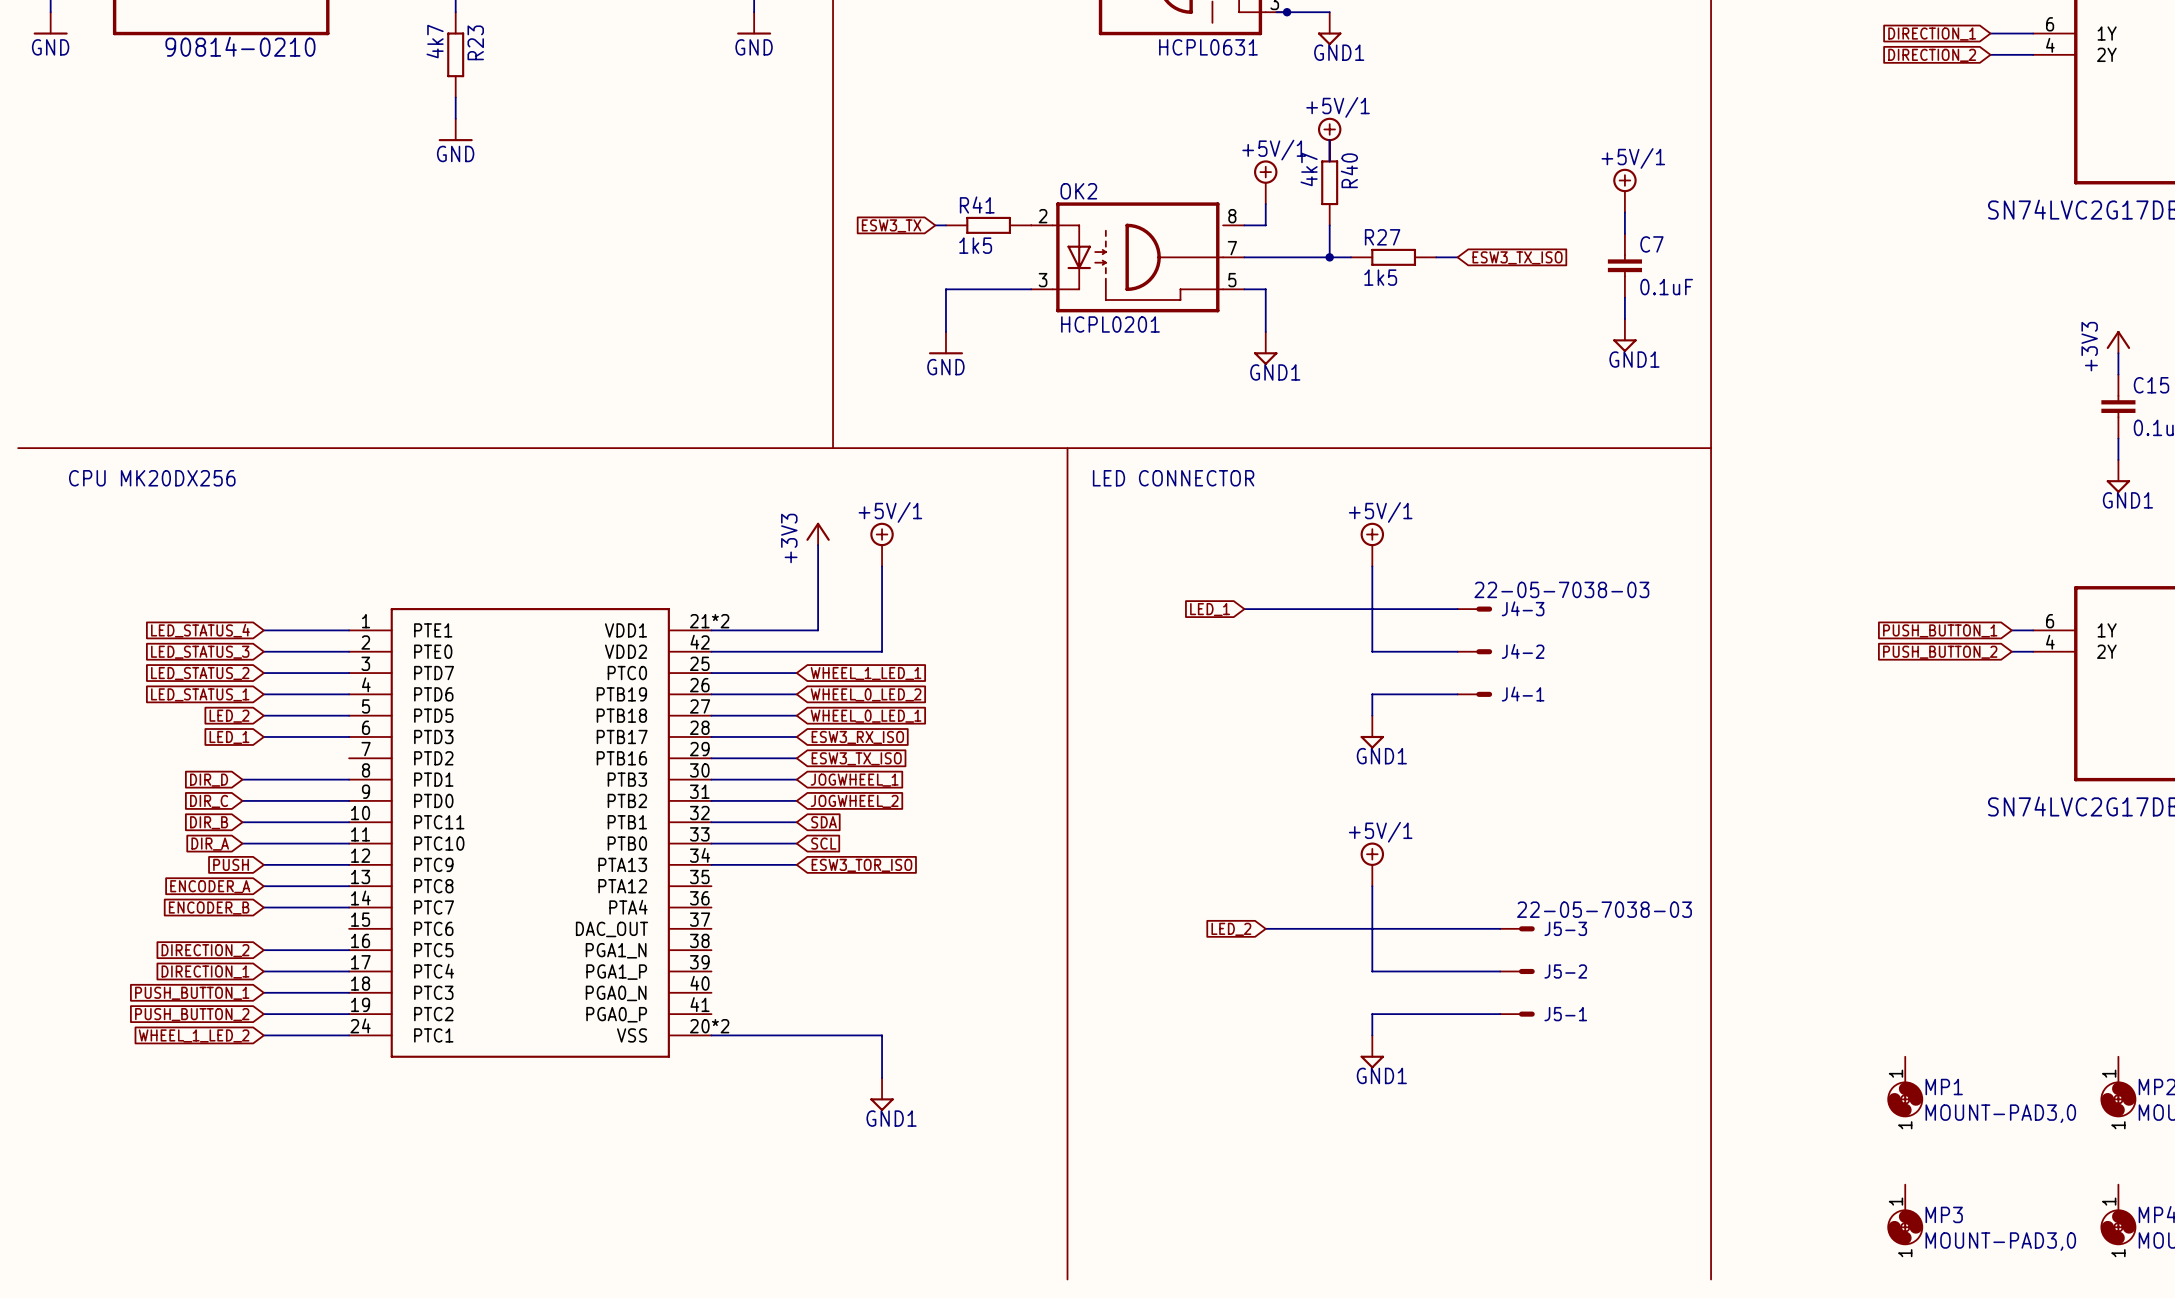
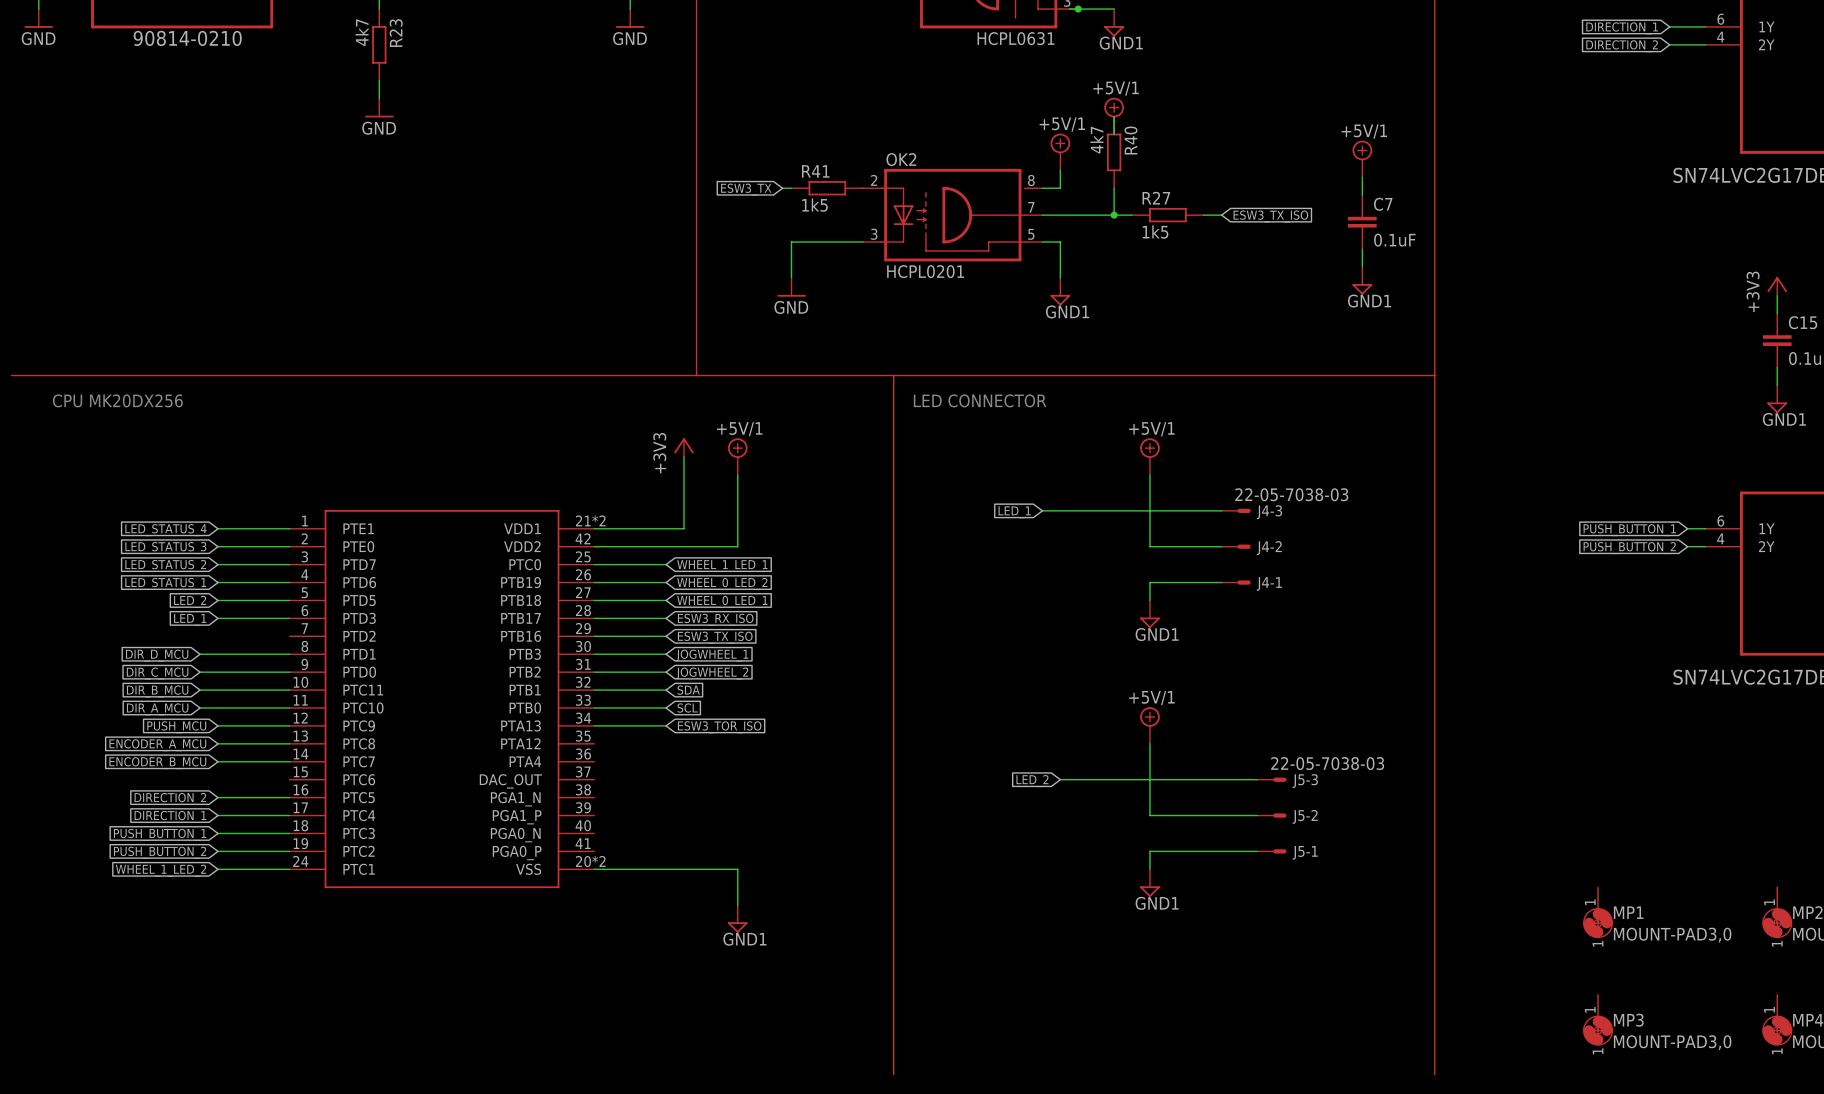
global label: DIR_D (209, 780) -> DIR_D_MCU (157, 655)
global label: DIR_C (209, 801) -> DIR_C_MCU (157, 673)
global label: DIR_B (209, 822) -> DIR_B_MCU (157, 691)
global label: DIR_A (210, 844) -> DIR_A_MCU (157, 709)
global label: PUSH (231, 864) -> PUSH_MCU (176, 727)
global label: ENCODER_A (210, 886) -> ENCODER_A_MCU (157, 745)
global label: ENCODER_B (209, 908) -> ENCODER_B_MCU (157, 763)

